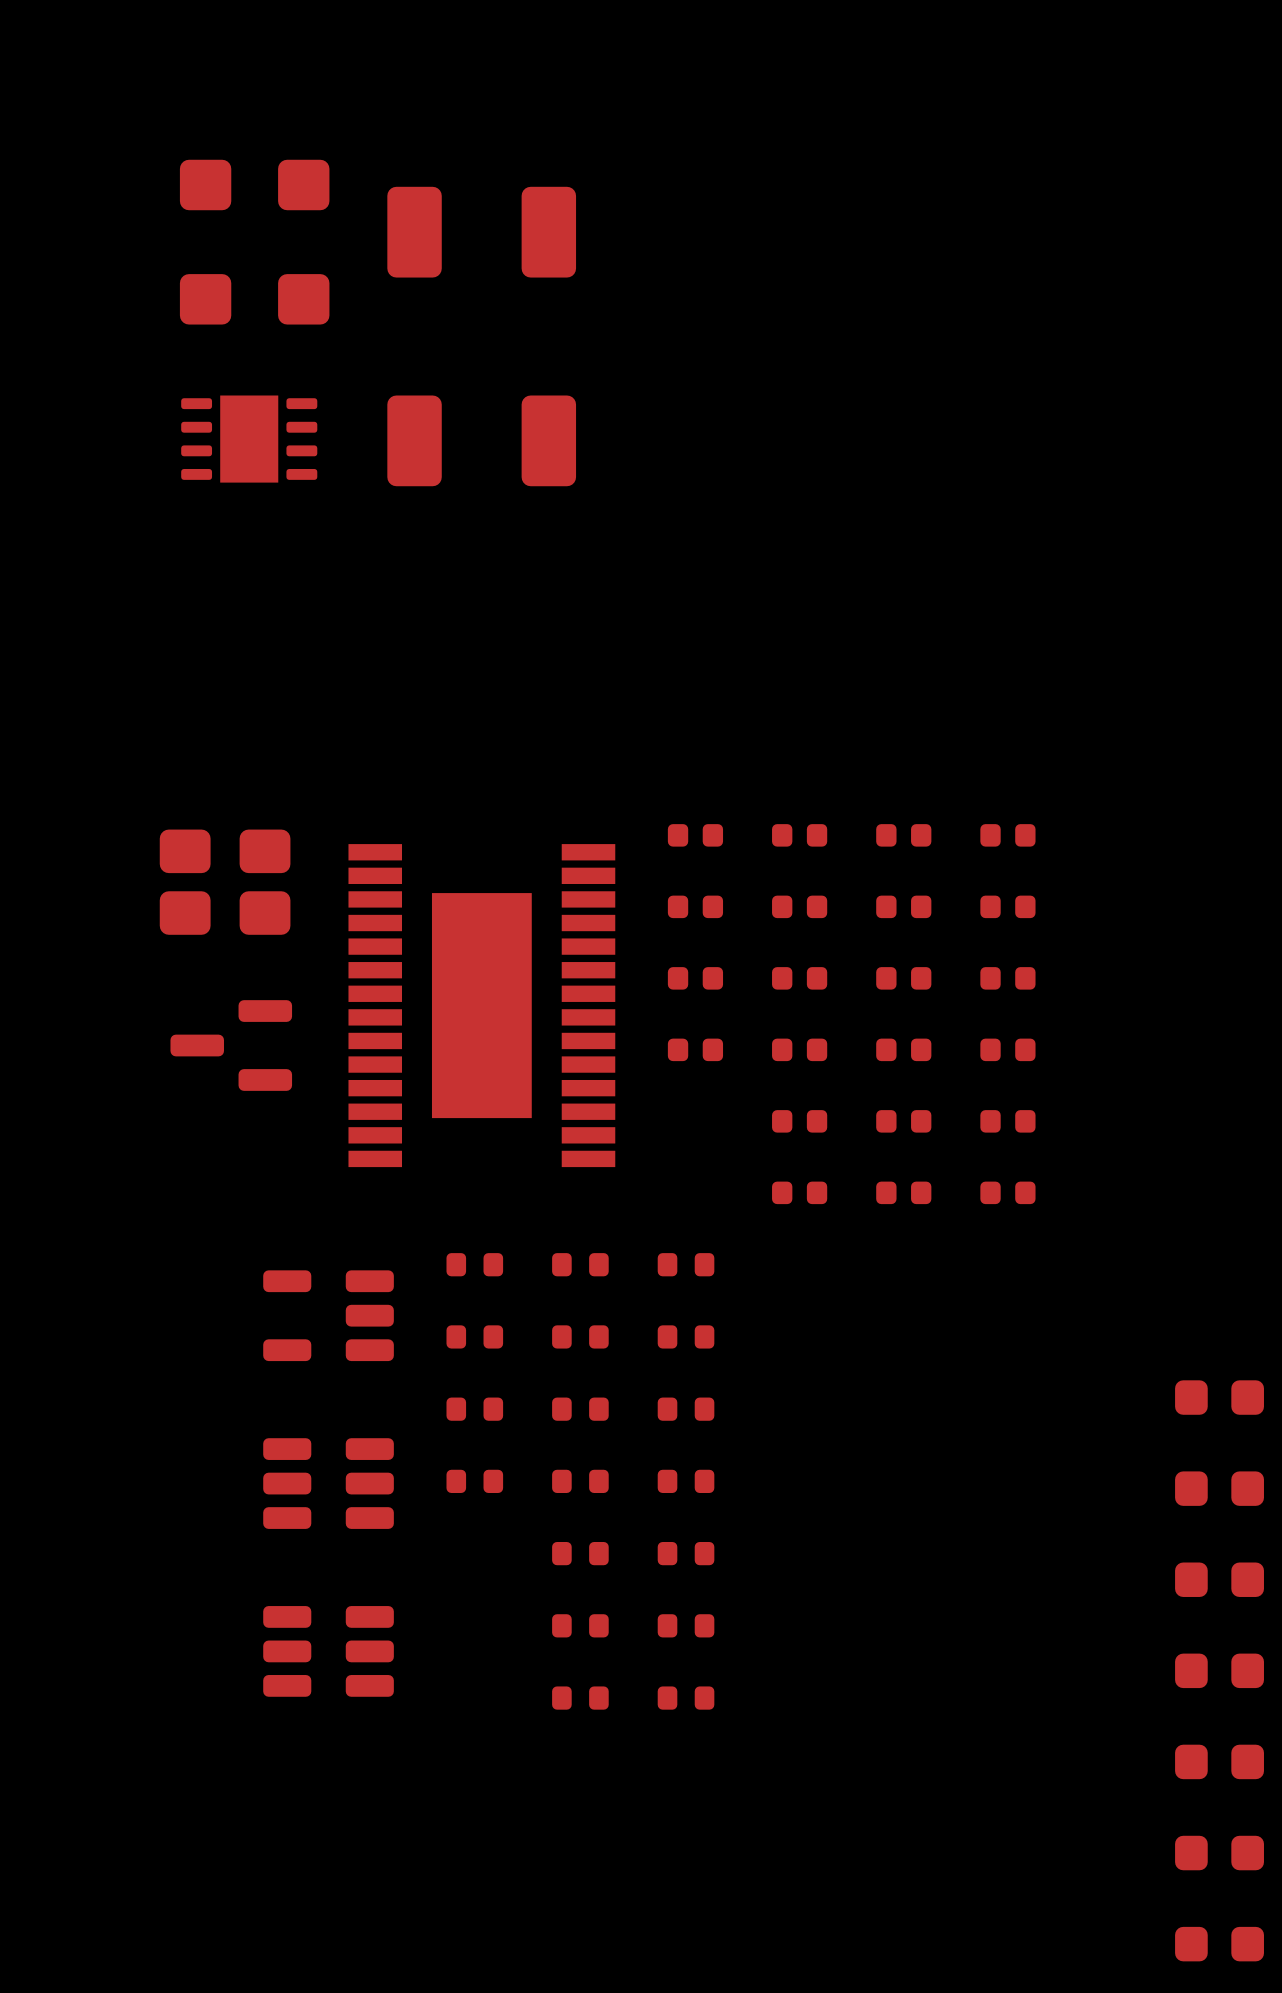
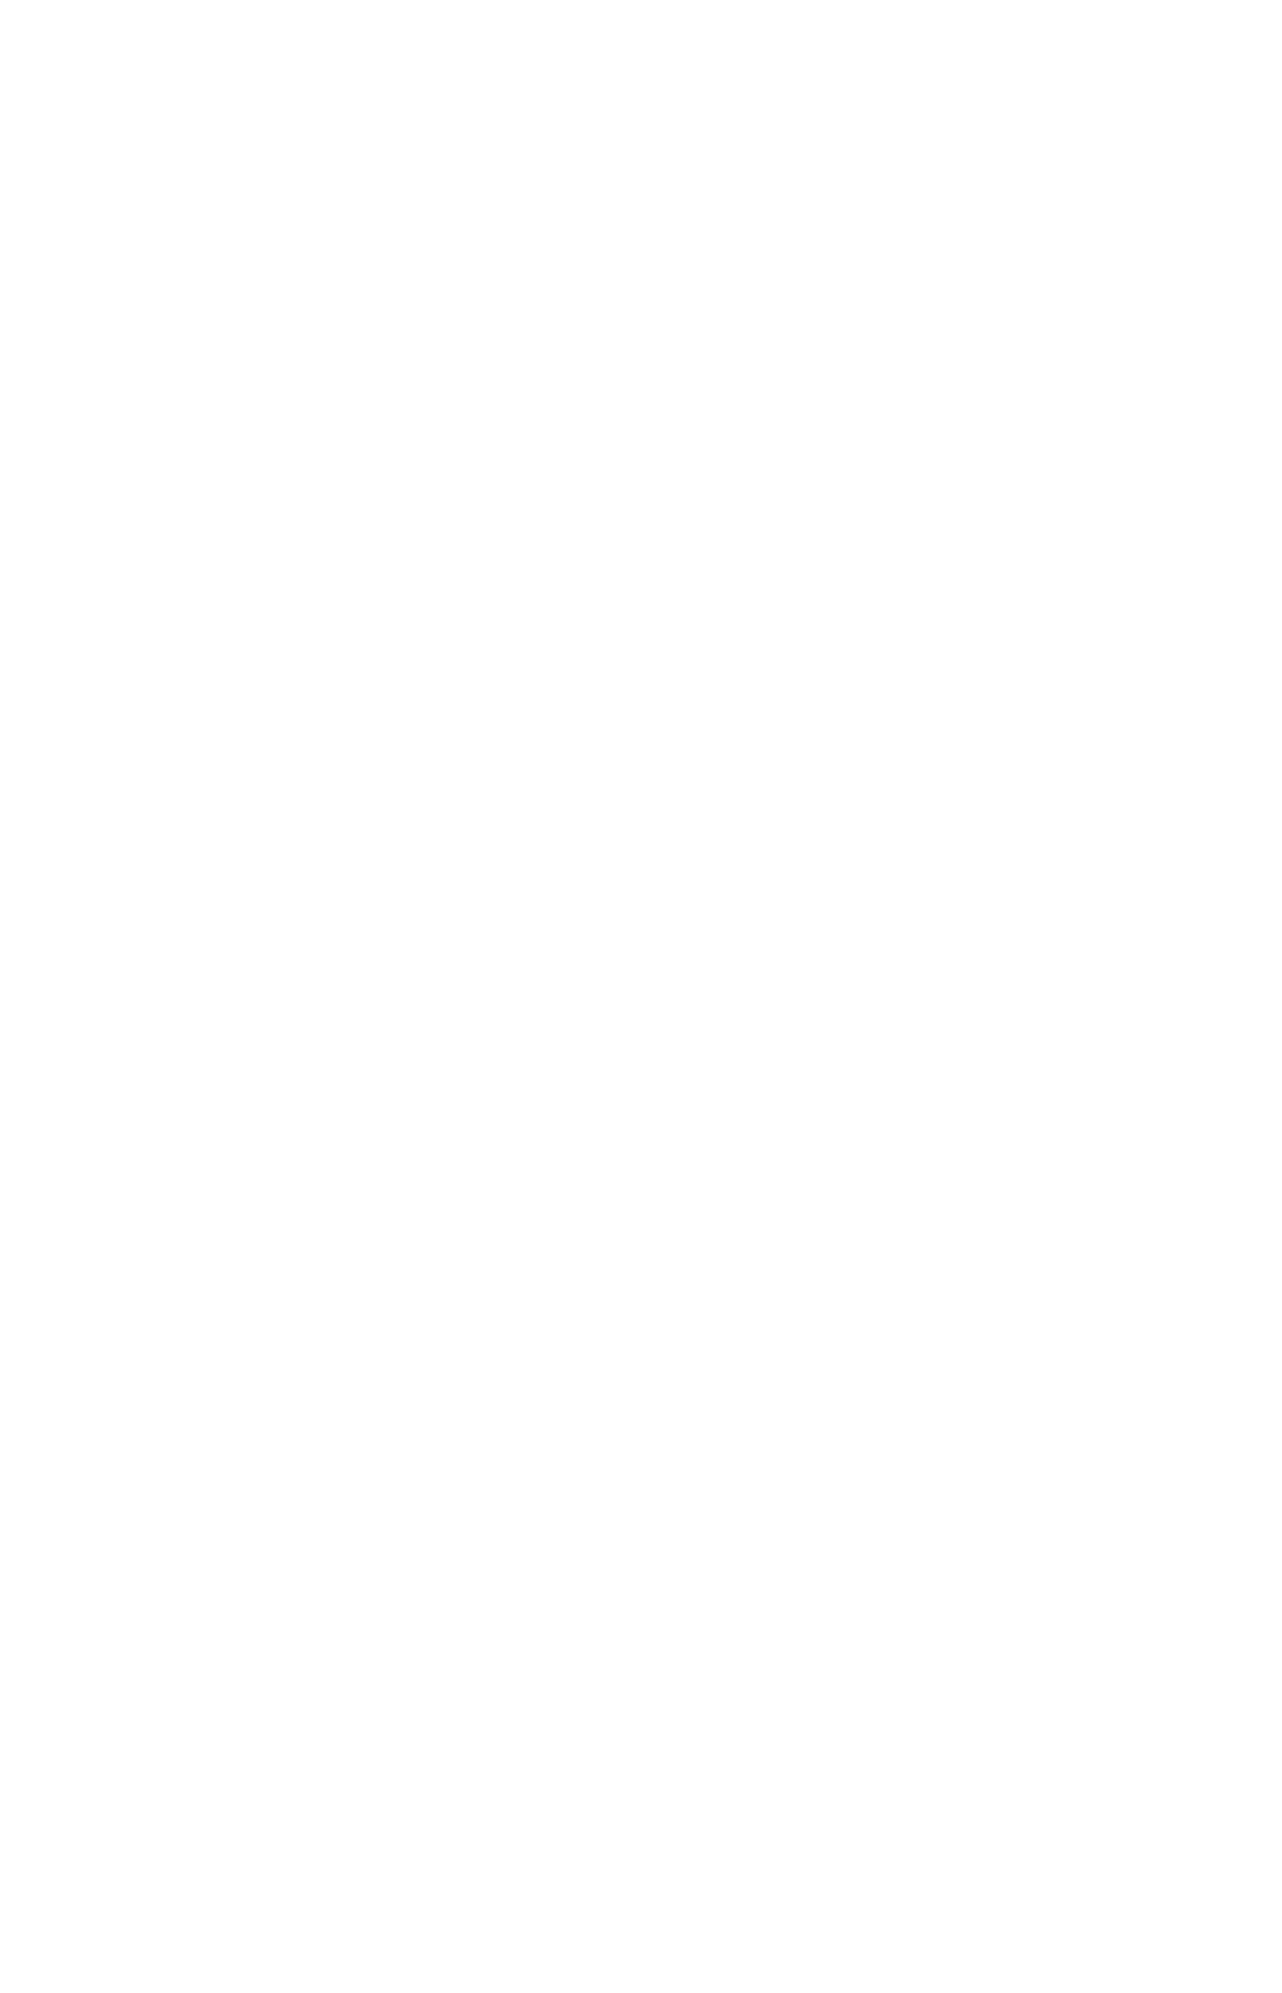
part: (254, 184) -> none
part: (481, 232) -> none
part: (254, 299) -> none
part: (249, 439) -> none
part: (481, 440) -> none
part: (695, 835) -> none
part: (799, 835) -> none
part: (903, 835) -> none
part: (1007, 835) -> none
part: (225, 882) -> none
part: (695, 906) -> none
part: (799, 906) -> none
part: (903, 906) -> none
part: (1007, 906) -> none
part: (695, 978) -> none
part: (799, 978) -> none
part: (903, 978) -> none
part: (1007, 978) -> none
part: (481, 1005) -> none
part: (231, 1045) -> none
part: (695, 1049) -> none
part: (799, 1049) -> none
part: (903, 1049) -> none
part: (1007, 1049) -> none
part: (799, 1121) -> none
part: (903, 1121) -> none
part: (1007, 1121) -> none
part: (799, 1192) -> none
part: (903, 1192) -> none
part: (1007, 1192) -> none
part: (474, 1264) -> none
part: (580, 1264) -> none
part: (686, 1264) -> none
part: (328, 1315) -> none
part: (474, 1336) -> none
part: (580, 1336) -> none
part: (686, 1336) -> none
part: (1219, 1397) -> none
part: (474, 1409) -> none
part: (580, 1409) -> none
part: (686, 1409) -> none
part: (474, 1481) -> none
part: (580, 1481) -> none
part: (686, 1481) -> none
part: (328, 1483) -> none
part: (1219, 1488) -> none
part: (580, 1553) -> none
part: (686, 1553) -> none
part: (1219, 1579) -> none
part: (580, 1625) -> none
part: (686, 1625) -> none
part: (328, 1651) -> none
part: (1219, 1670) -> none
part: (580, 1698) -> none
part: (686, 1698) -> none
part: (1219, 1761) -> none
part: (1219, 1853) -> none
part: (1219, 1944) -> none

